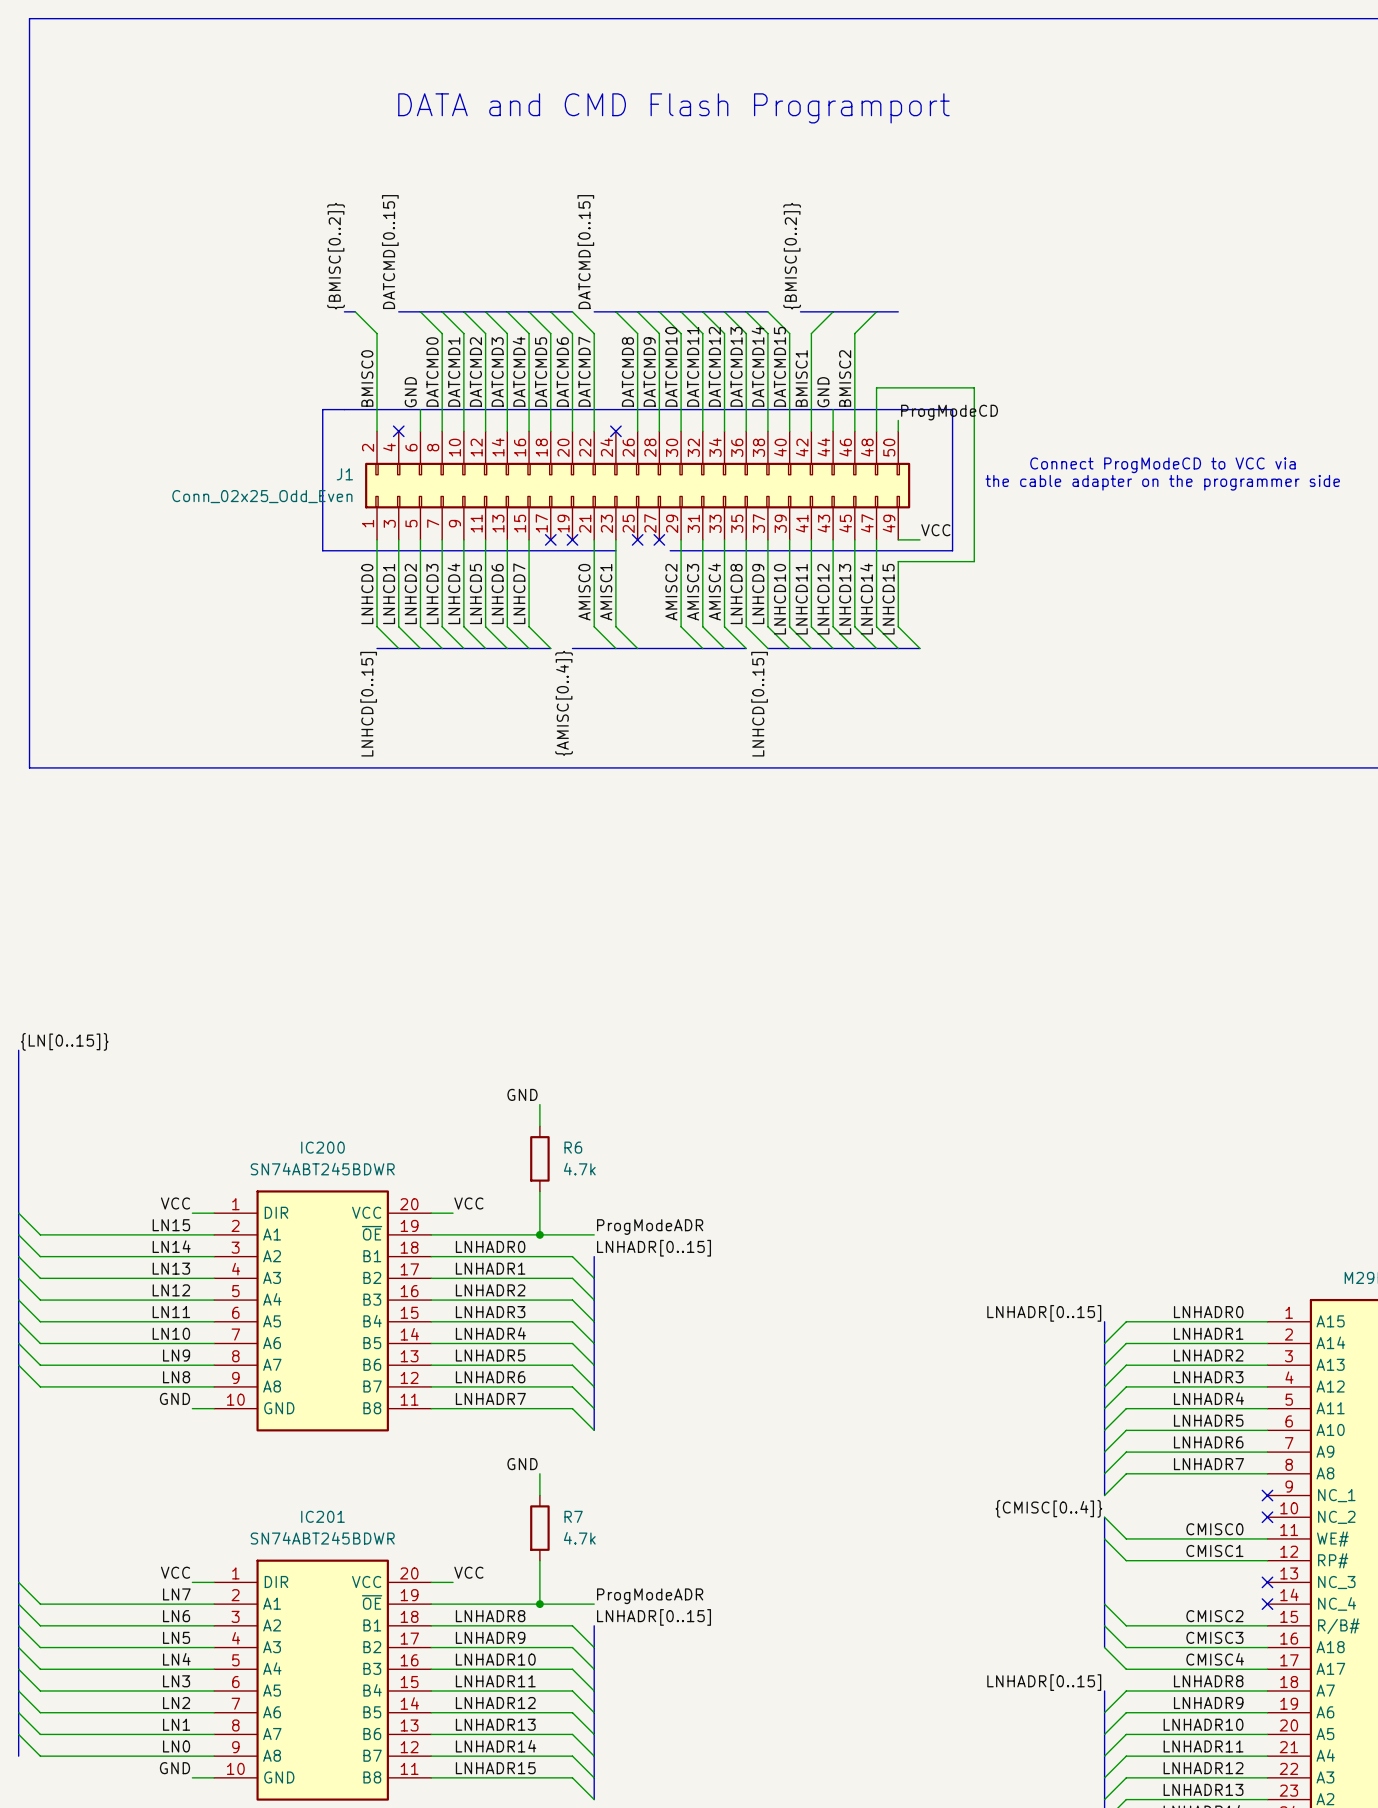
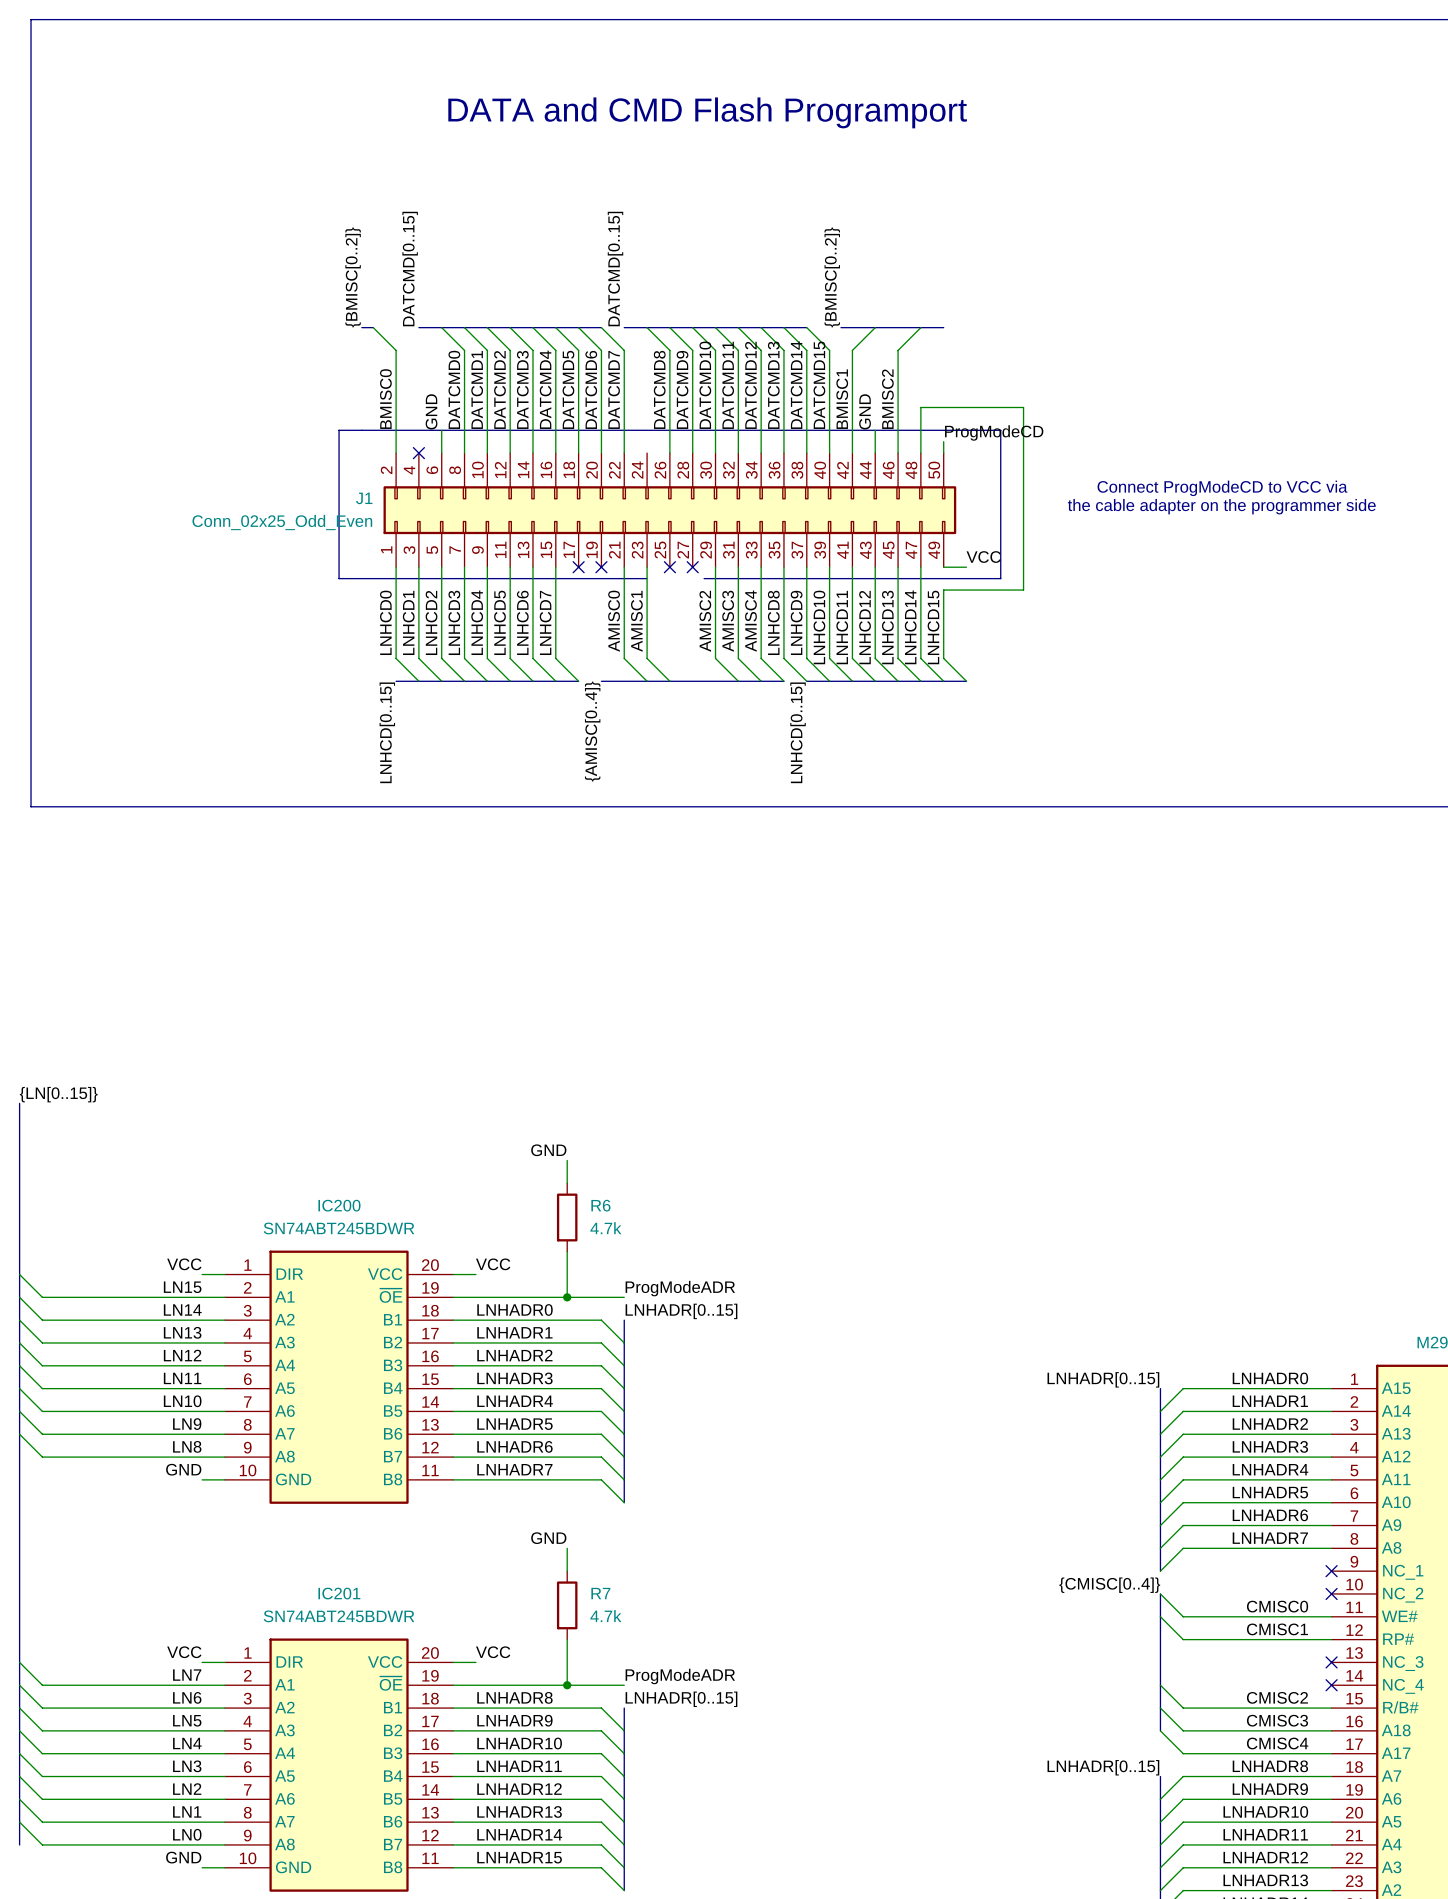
no-connect mark: (615, 431) -> none

